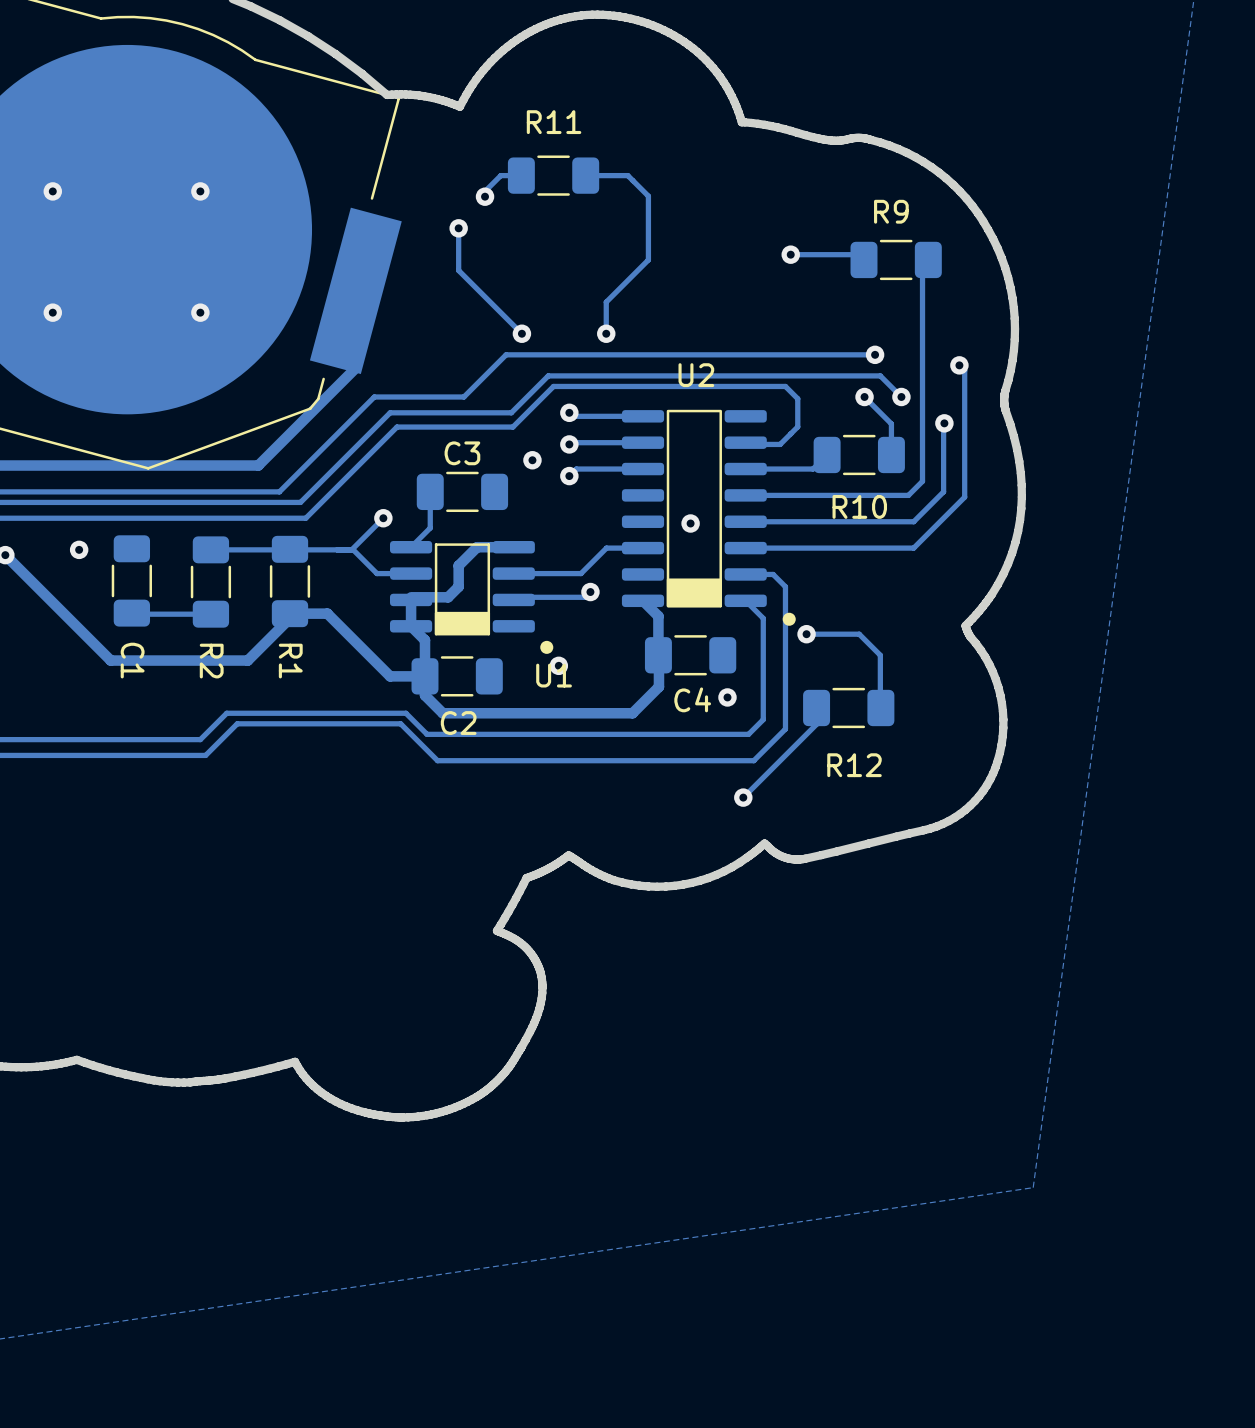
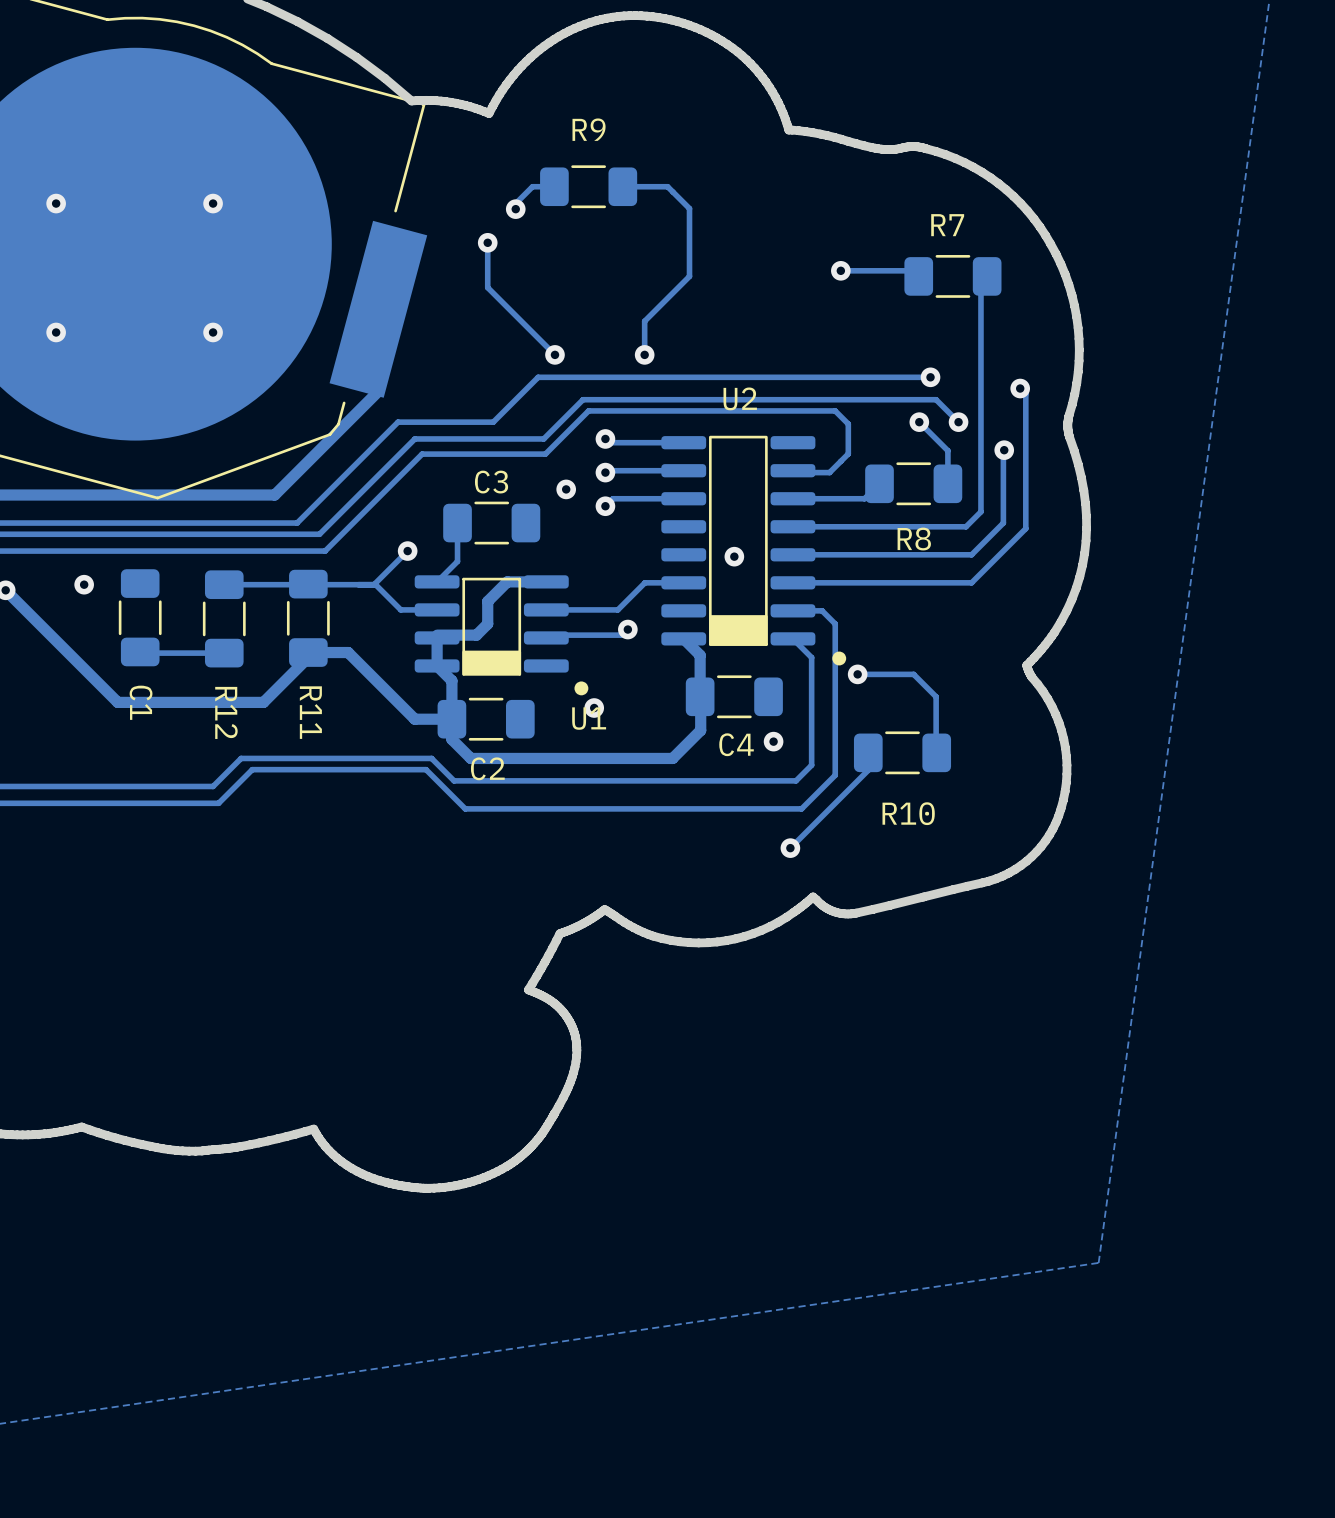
R11 name: R11 (554, 122) -> R9 (589, 129)
R9 name: R9 (891, 211) -> R7 (947, 225)
R10 name: R10 (859, 506) -> R8 (914, 539)
R2 name: R2 (211, 661) -> R12 (226, 712)
R1 name: R1 (290, 661) -> R11 (310, 712)
R12 name: R12 (854, 765) -> R10 (908, 813)

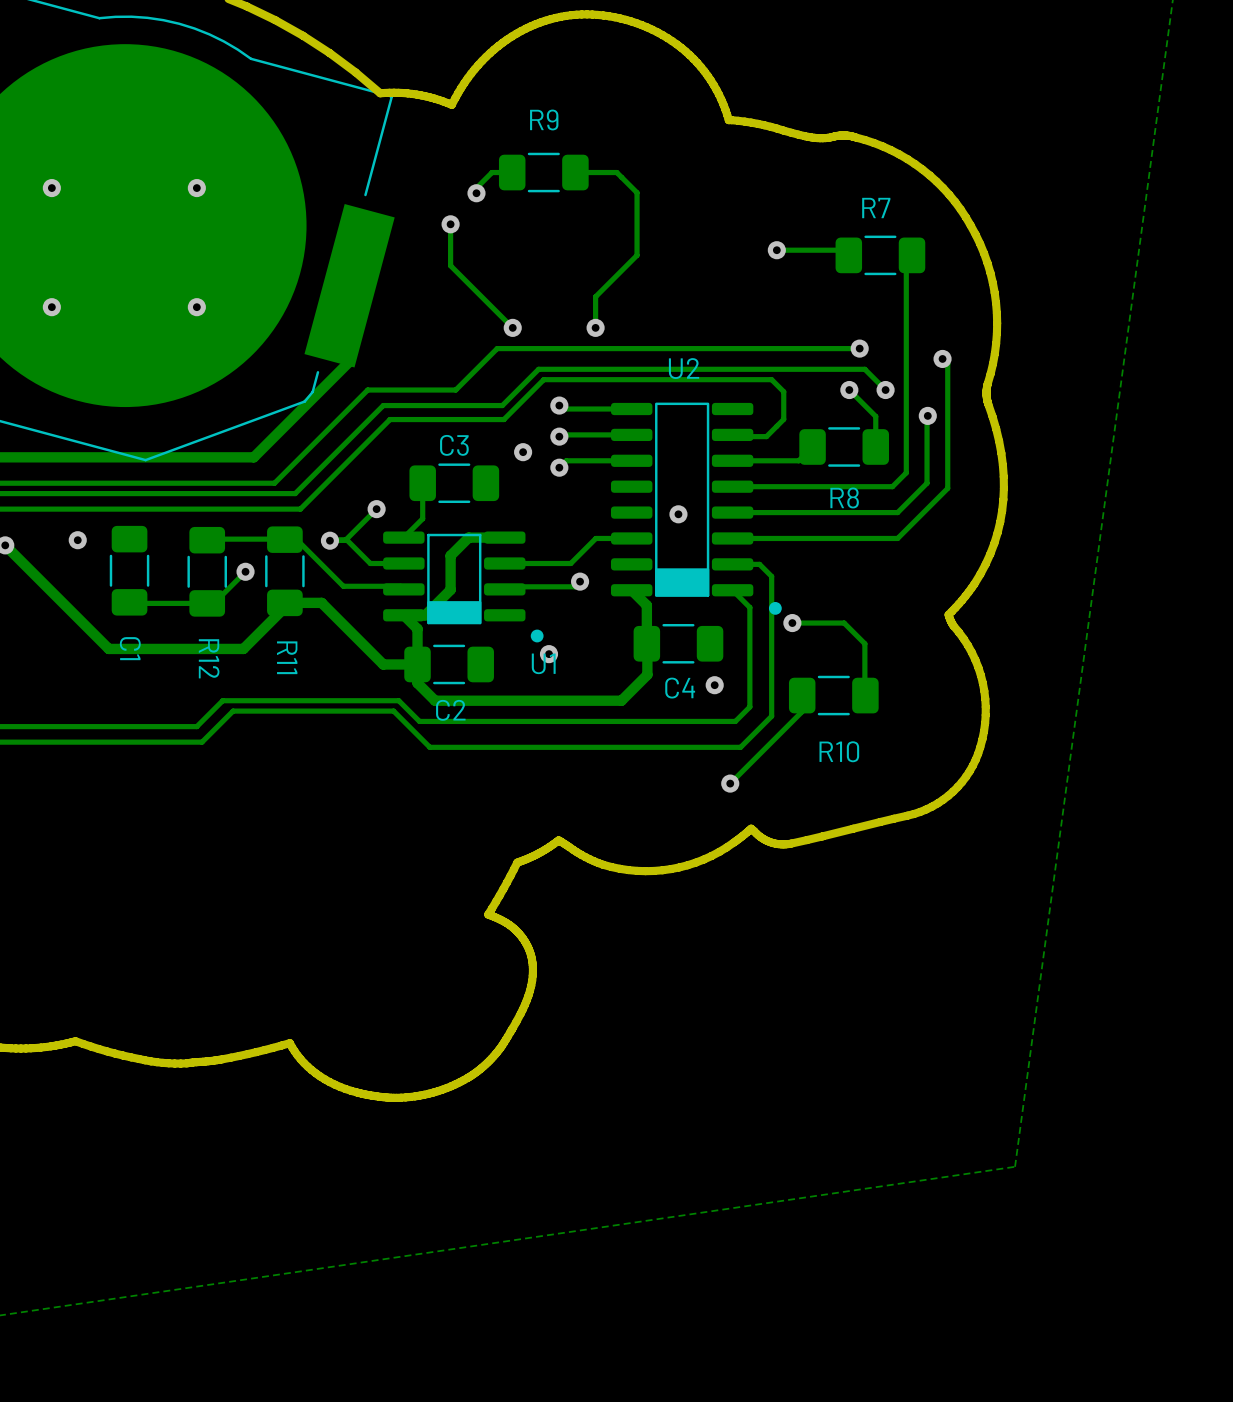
track: (358, 584) (224, 584) -> none
via: none -> (329, 540)
track: none -> (245, 571) (216, 600) (208, 600)
via: none -> (245, 571)
track: (487, 623) (476, 635) (437, 635) -> (450, 576) (450, 589) (424, 615)
track: (437, 637) (437, 665) -> (403, 589) (400, 586) (343, 586) (296, 539) (210, 539) (208, 537)

